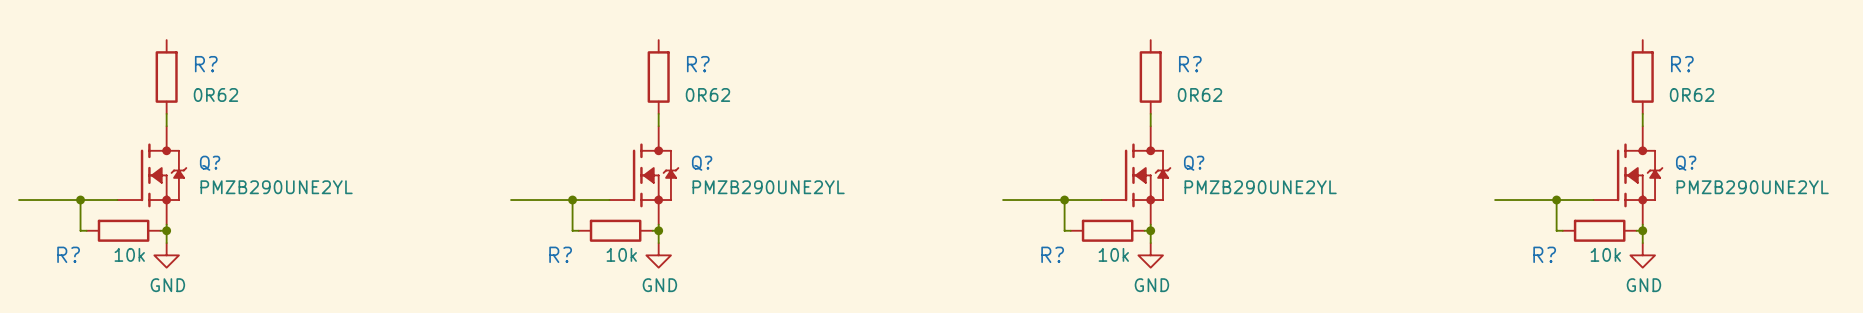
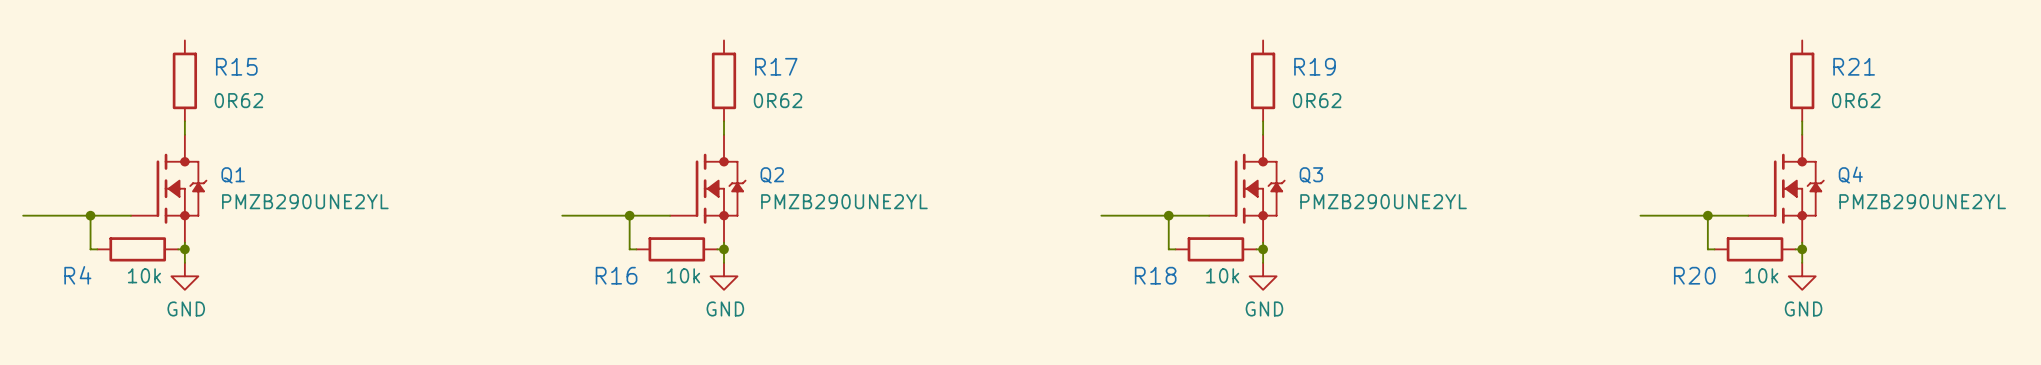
R? name: R? (206, 64) -> R15 (236, 66)
R? name: R? (698, 64) -> R17 (776, 66)
R? name: R? (1190, 64) -> R19 (1315, 66)
R? name: R? (1682, 64) -> R21 (1854, 66)
Q? name: Q? (210, 163) -> Q1 (233, 175)
Q? name: Q? (702, 163) -> Q2 (772, 175)
Q? name: Q? (1194, 163) -> Q3 (1311, 175)
Q? name: Q? (1686, 163) -> Q4 (1850, 175)
R? name: R? (68, 254) -> R4 (77, 275)
R? name: R? (560, 254) -> R16 (616, 275)
R? name: R? (1052, 254) -> R18 (1155, 275)
R? name: R? (1544, 254) -> R20 (1694, 275)

